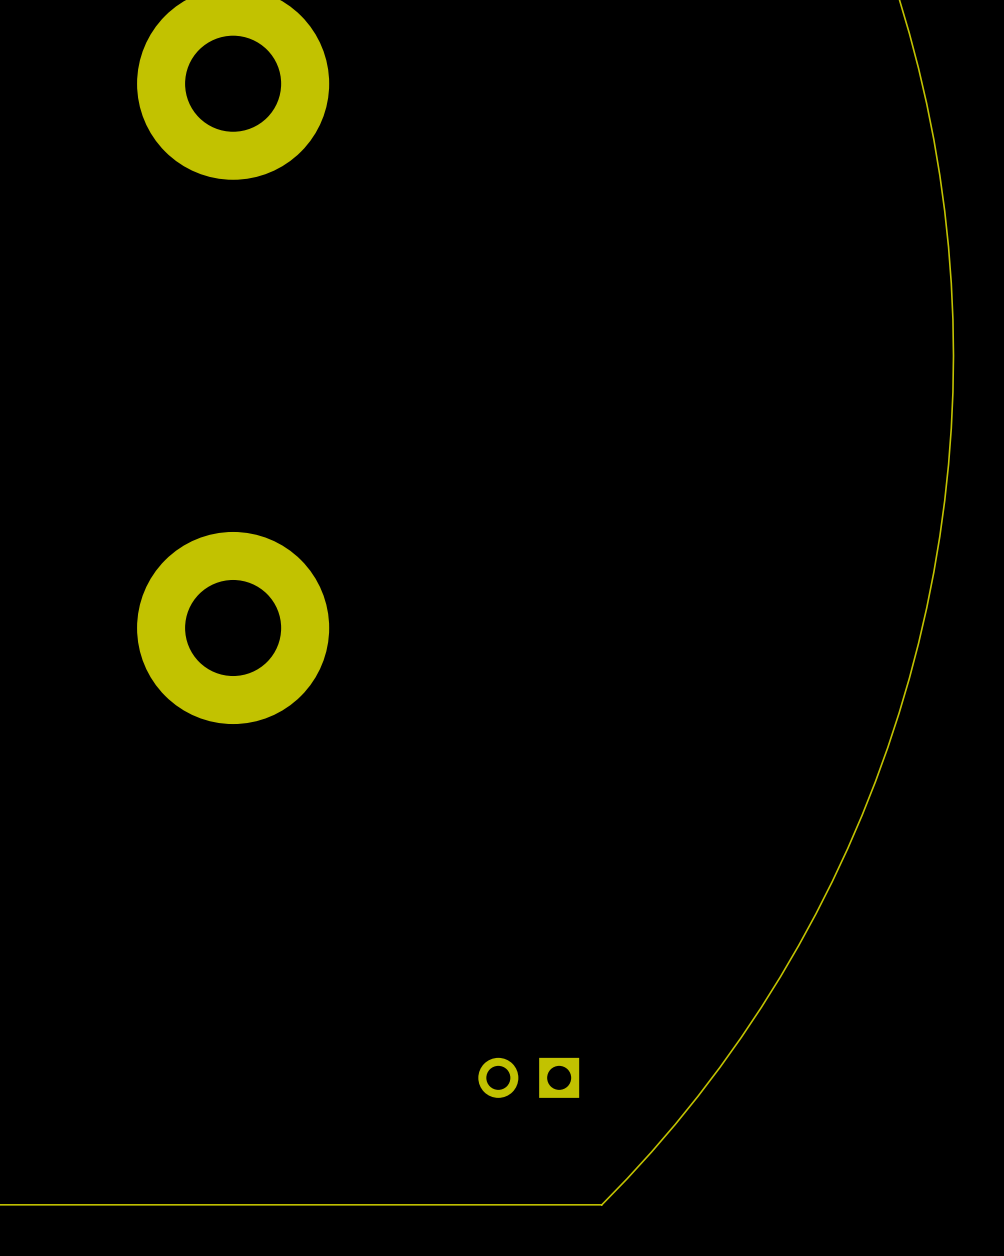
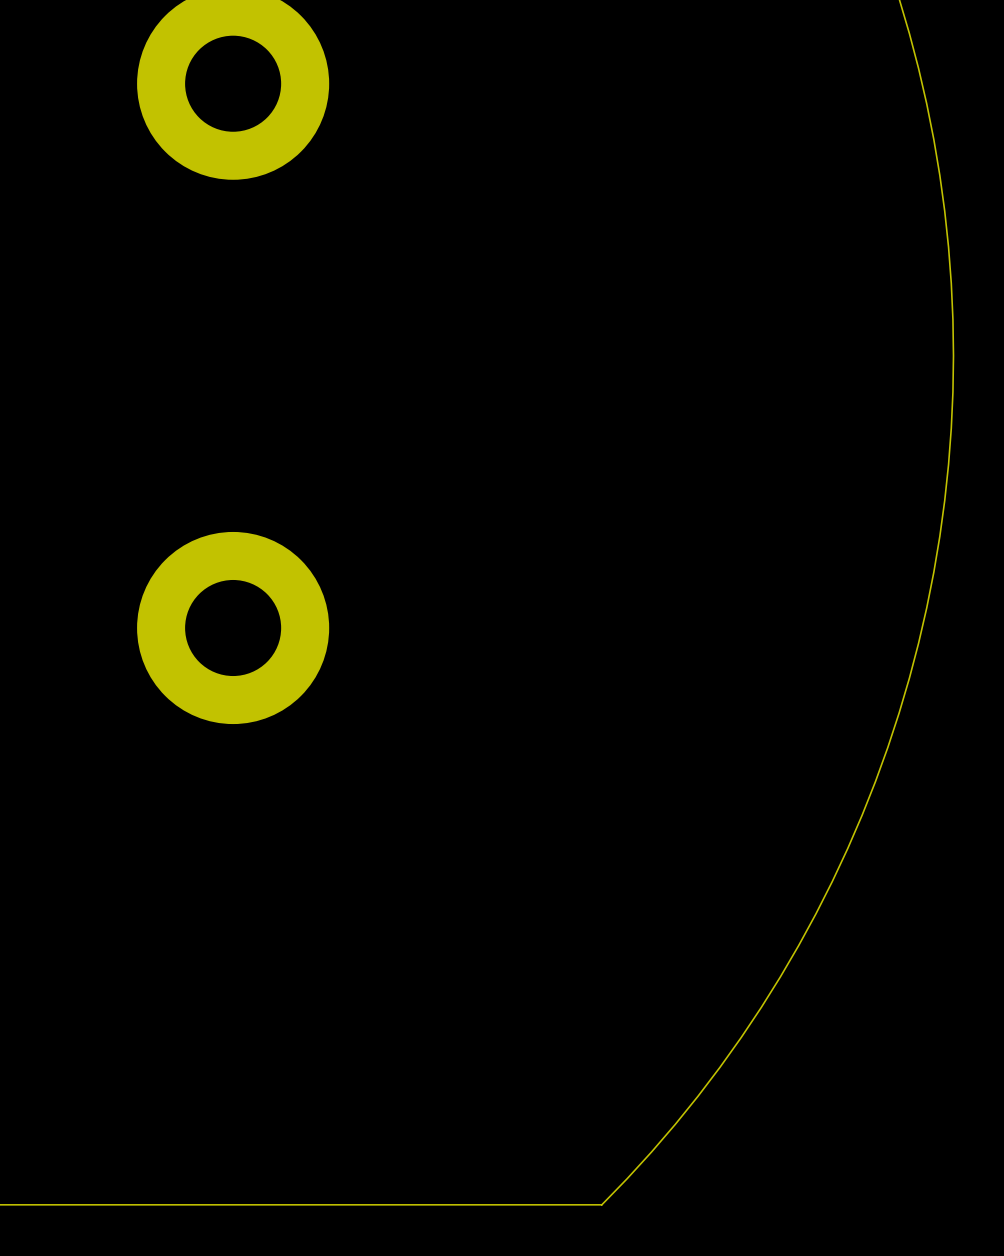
part: (528, 1077) -> none

